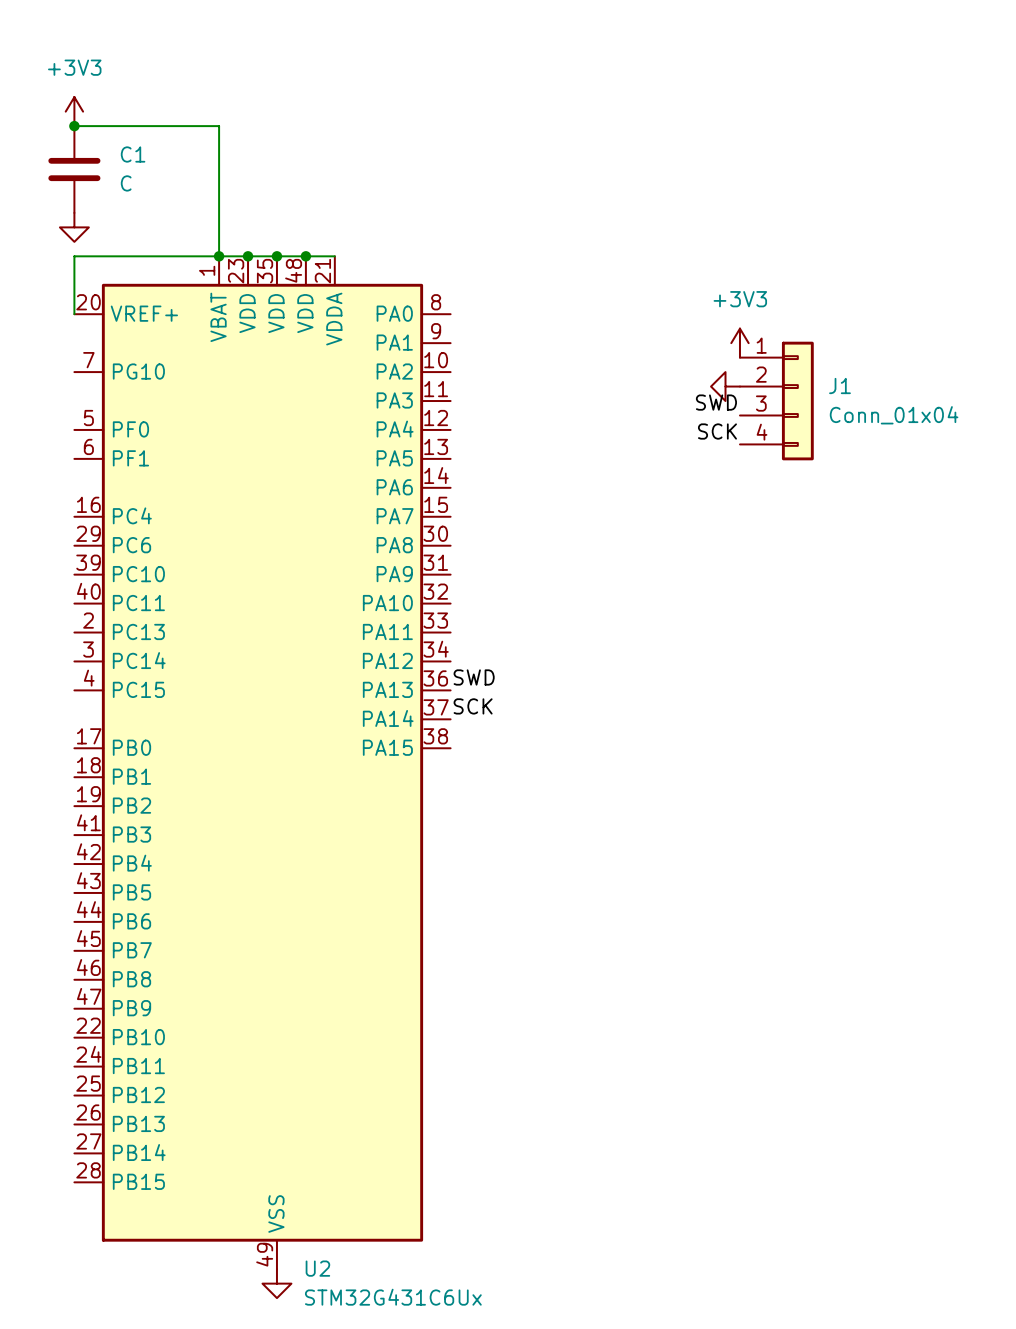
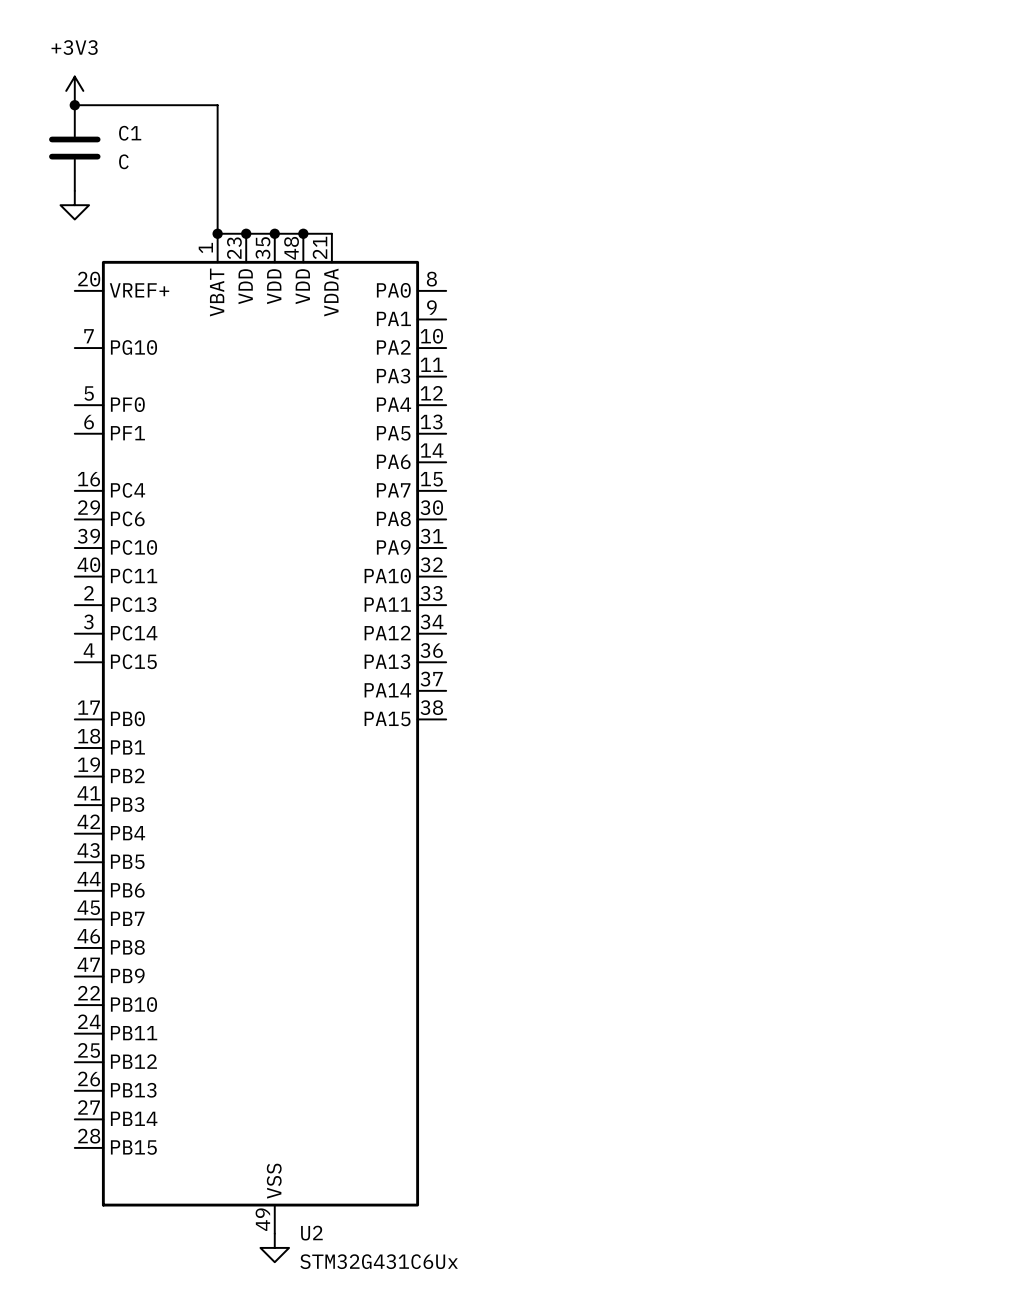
wire: (219, 256) (74, 256) (74, 314) -> none
power symbol: +3V3 (739, 343) -> none
power symbol: (725, 386) -> none
J1: Conn_01x04 (776, 401) -> none
label: SWD (716, 402) -> none
label: SCK (717, 431) -> none
label: SWD (474, 677) -> none
label: SCK (473, 706) -> none

